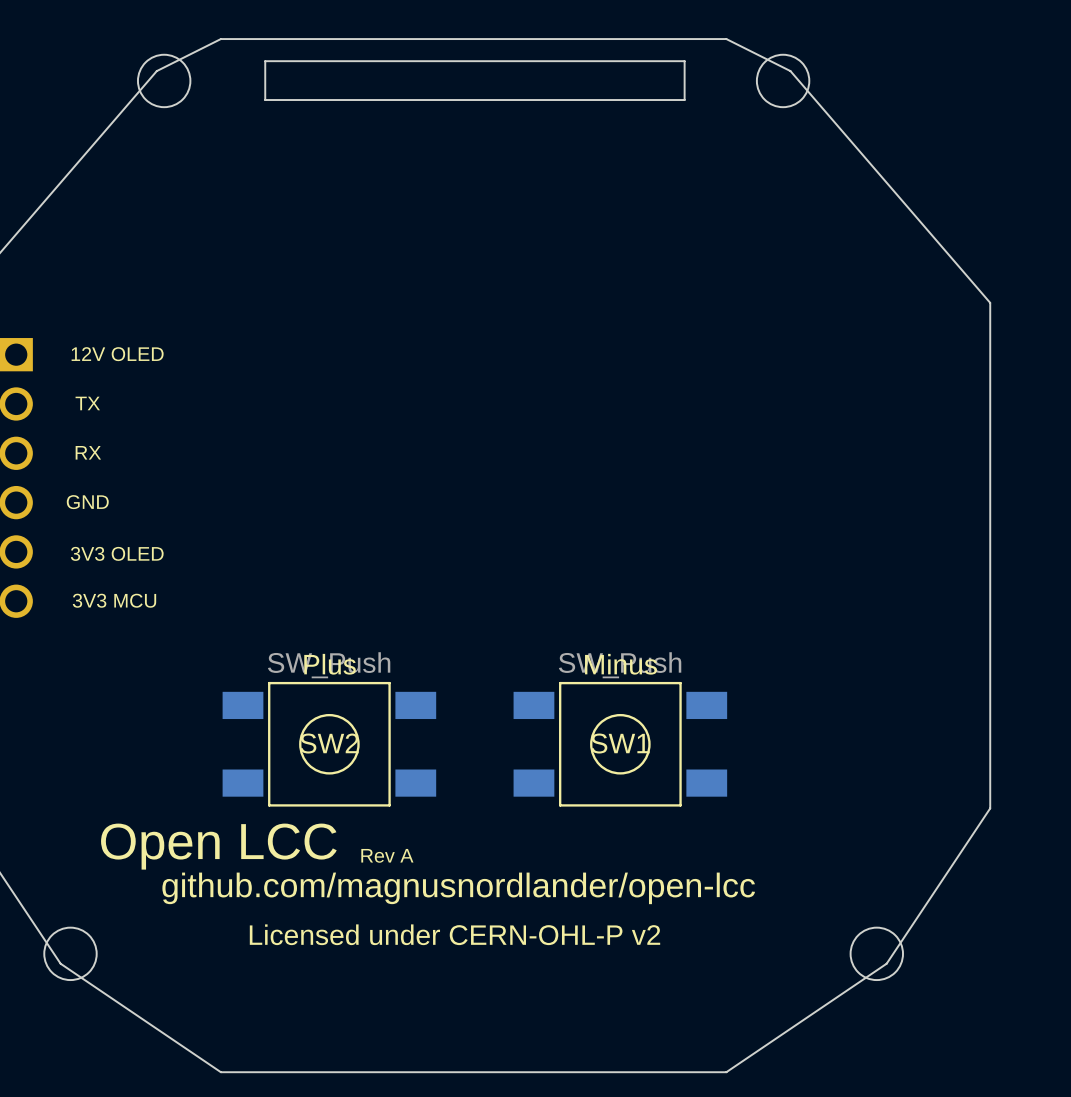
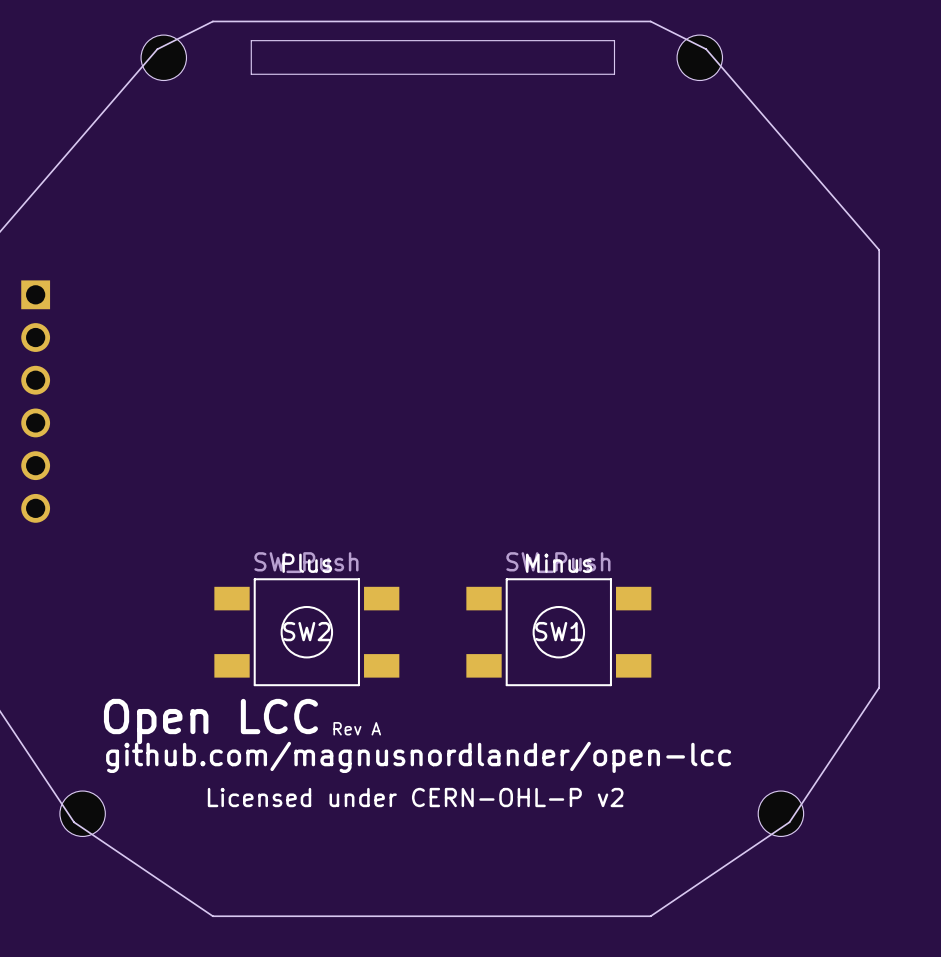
text: 12V OLED (117, 354) -> none
text: TX (87, 403) -> none
text: RX (88, 452) -> none
text: GND (87, 502) -> none
text: 3V3 OLED (117, 553) -> none
text: 3V3 MCU (114, 600) -> none

